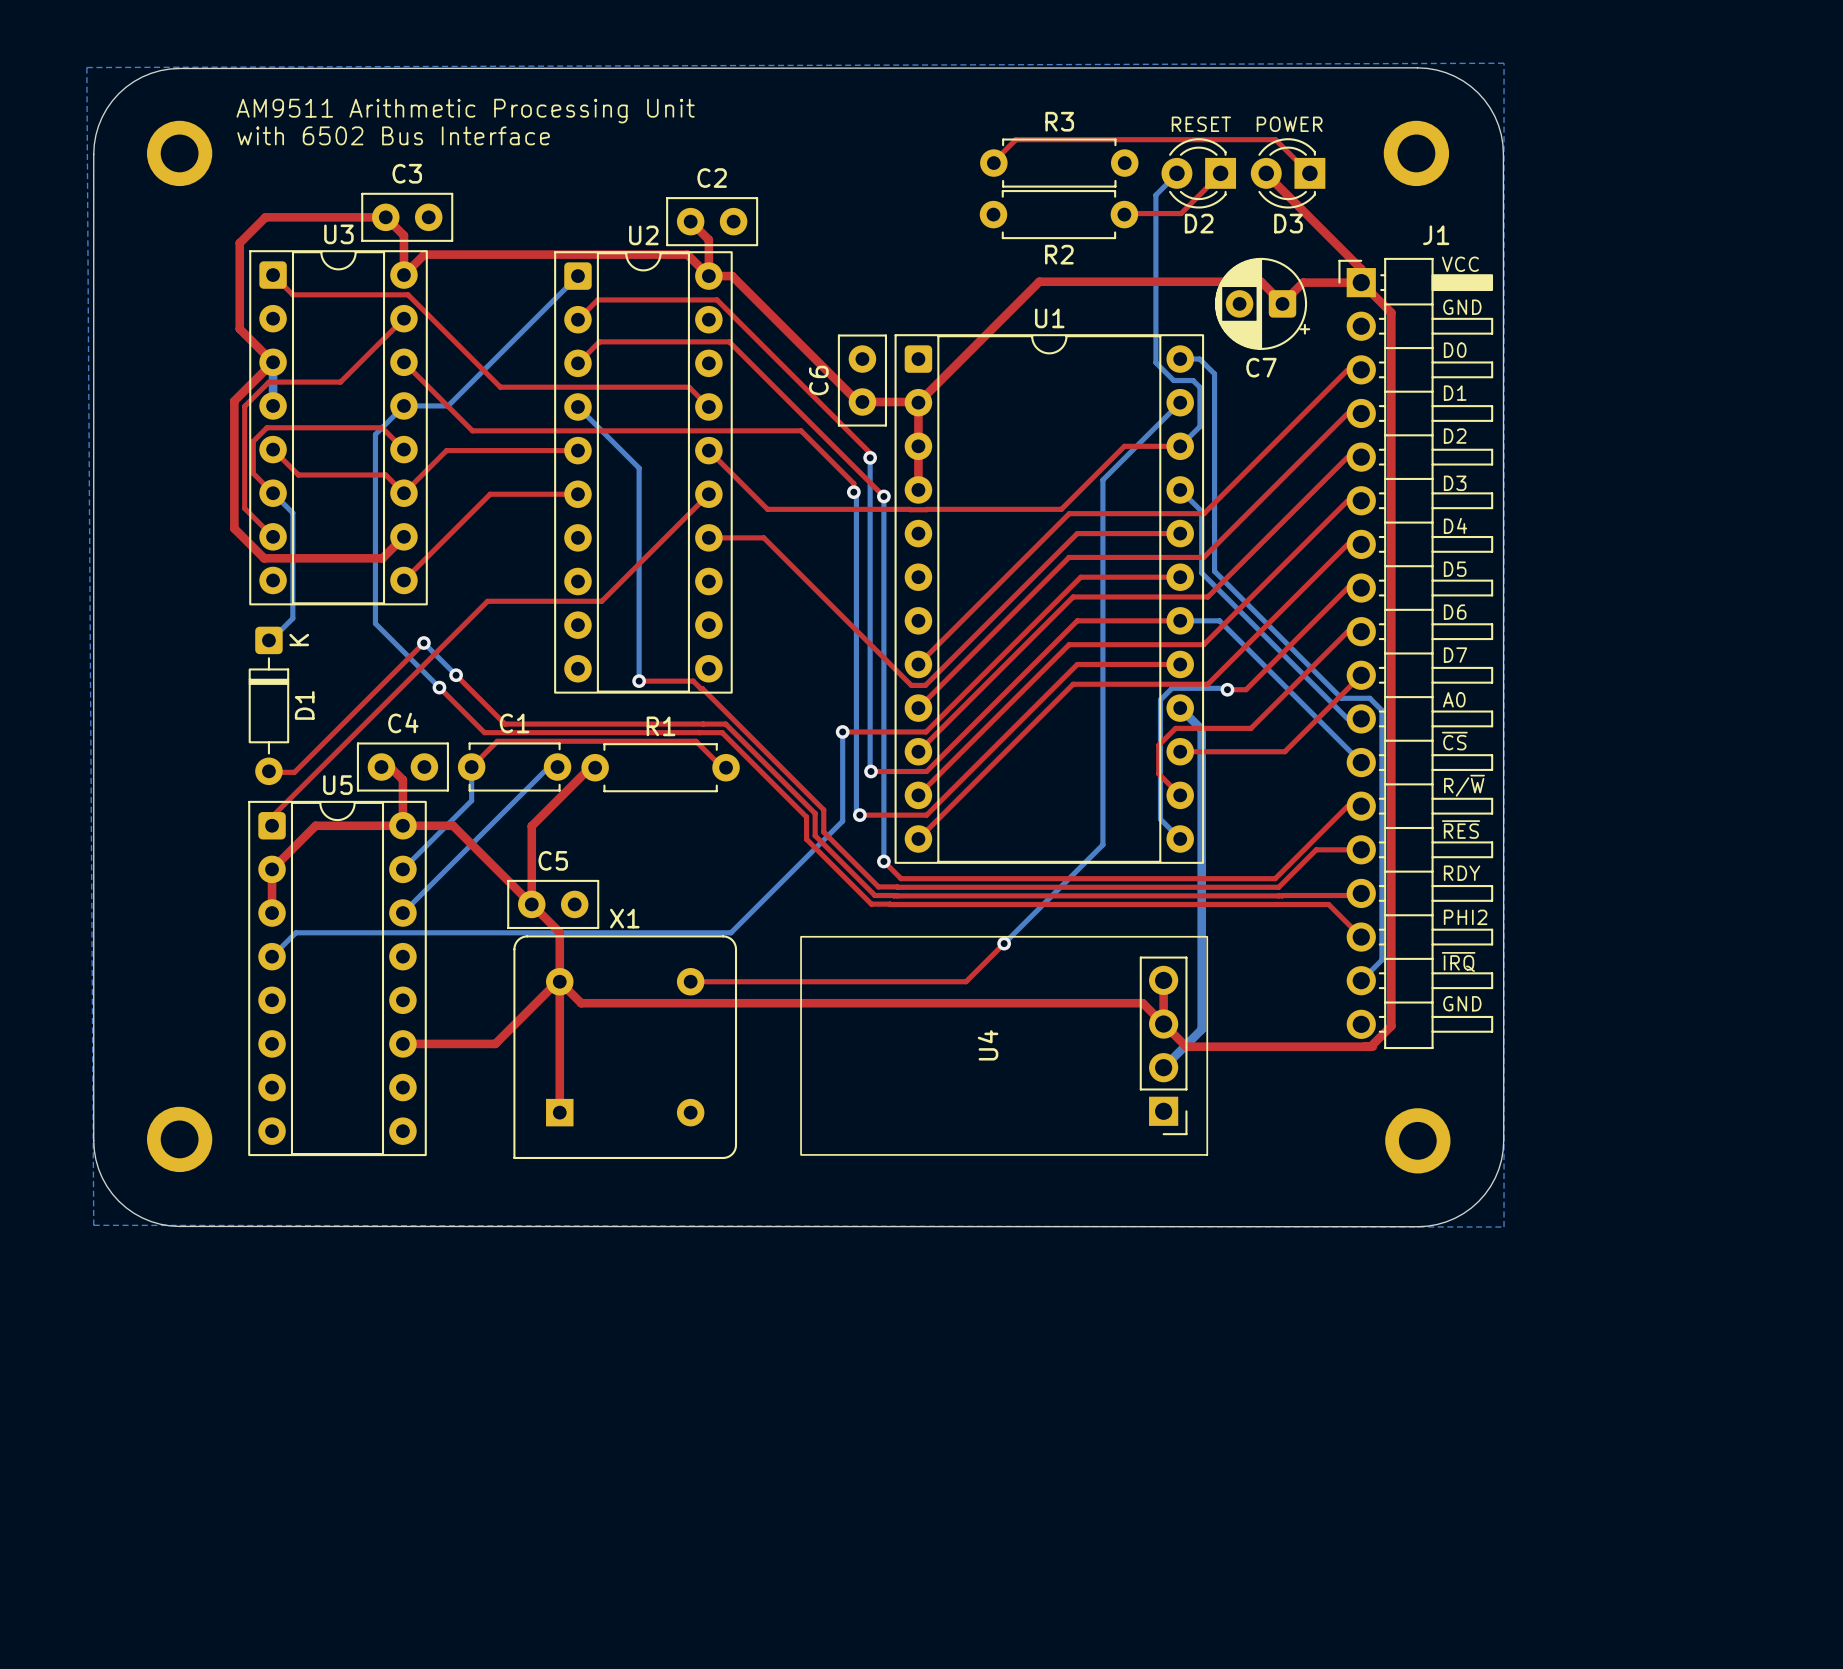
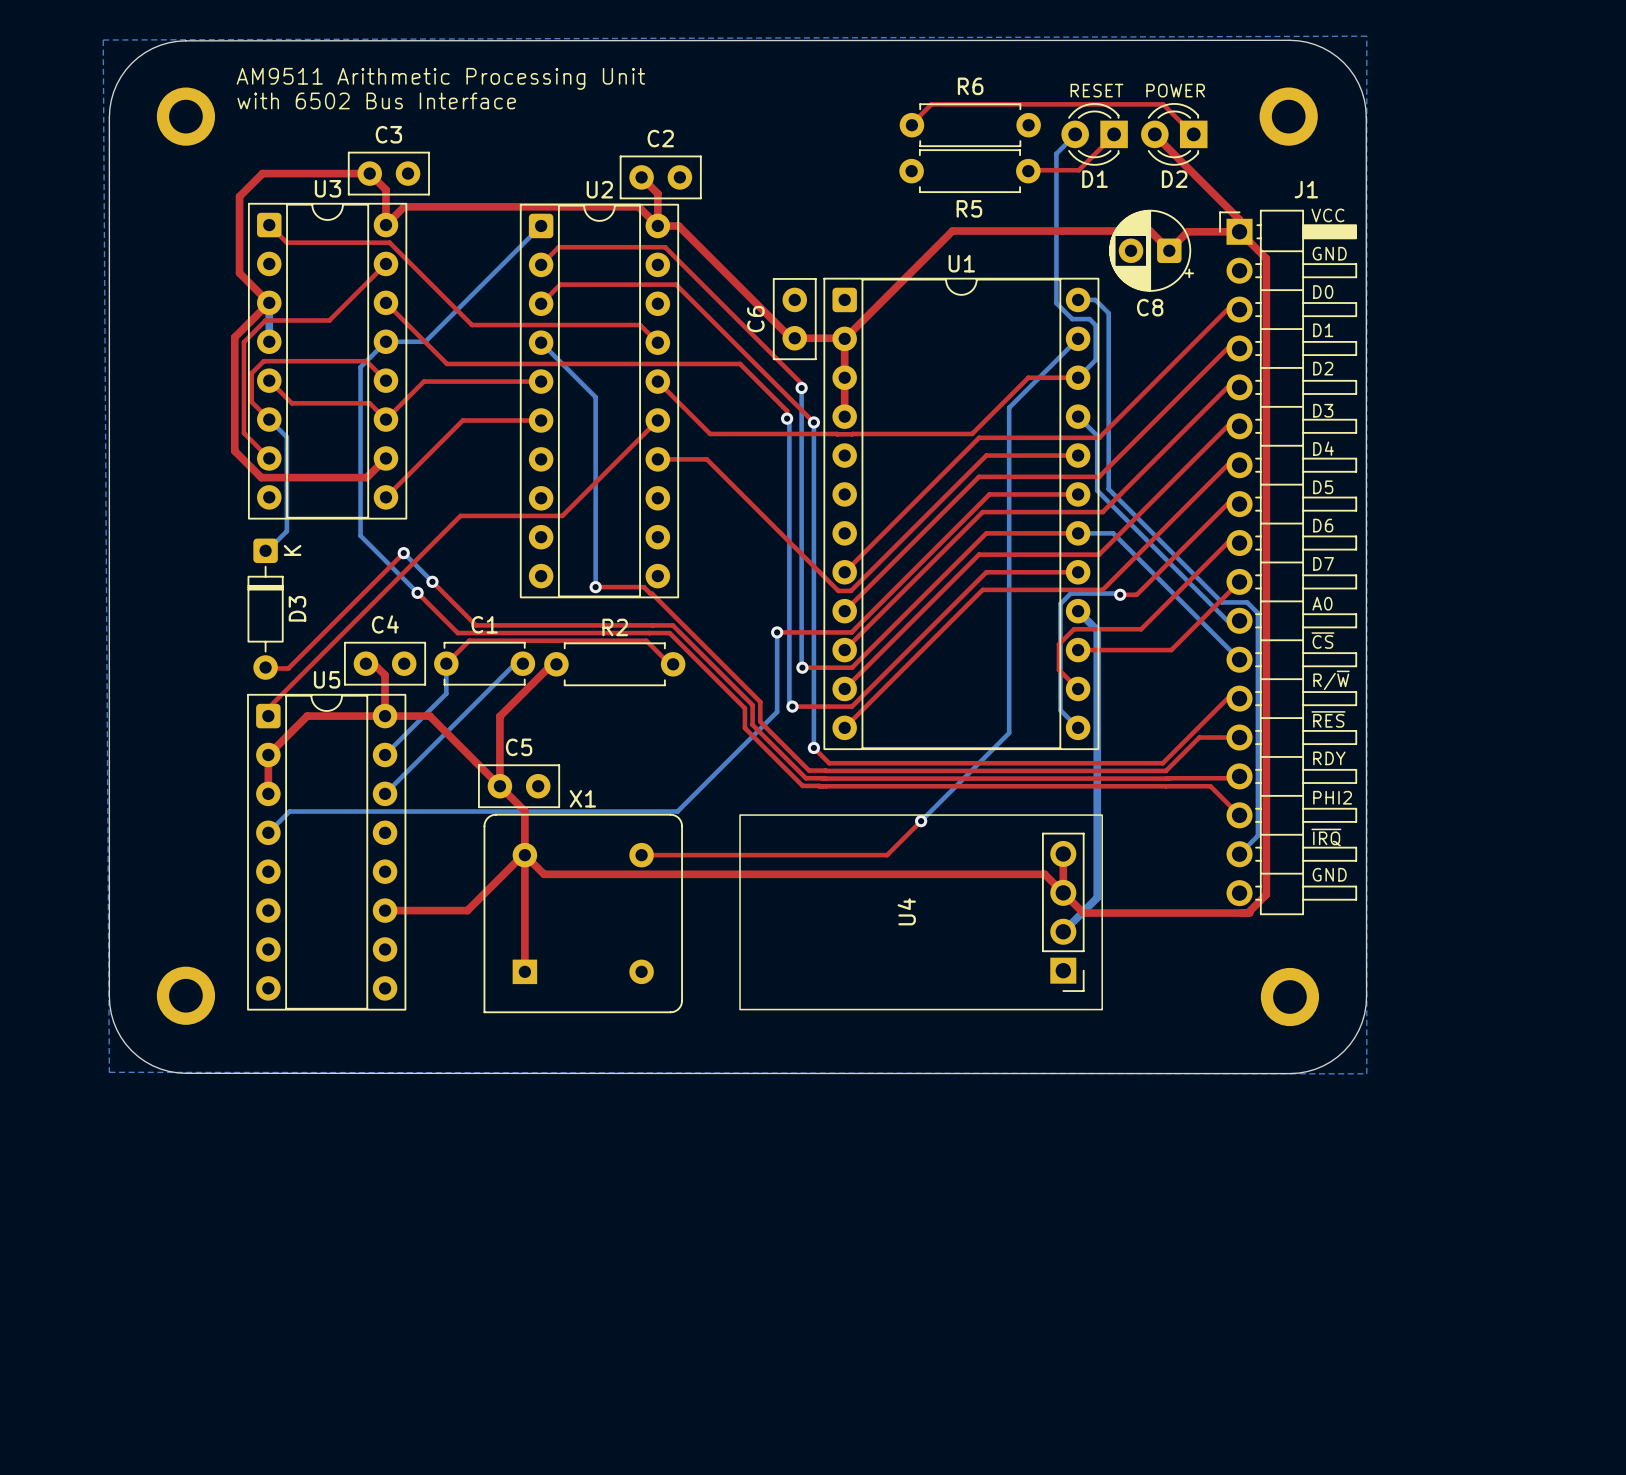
R3 name: R3 (1059, 121) -> R6 (970, 86)
D2 name: D2 (1199, 223) -> D1 (1095, 179)
D3 name: D3 (1288, 223) -> D2 (1174, 179)
R2 name: R2 (1059, 254) -> R5 (969, 208)
C7 name: C7 (1261, 367) -> C8 (1150, 307)
D1 name: D1 (304, 705) -> D3 (297, 608)
R1 name: R1 (661, 726) -> R2 (615, 627)

